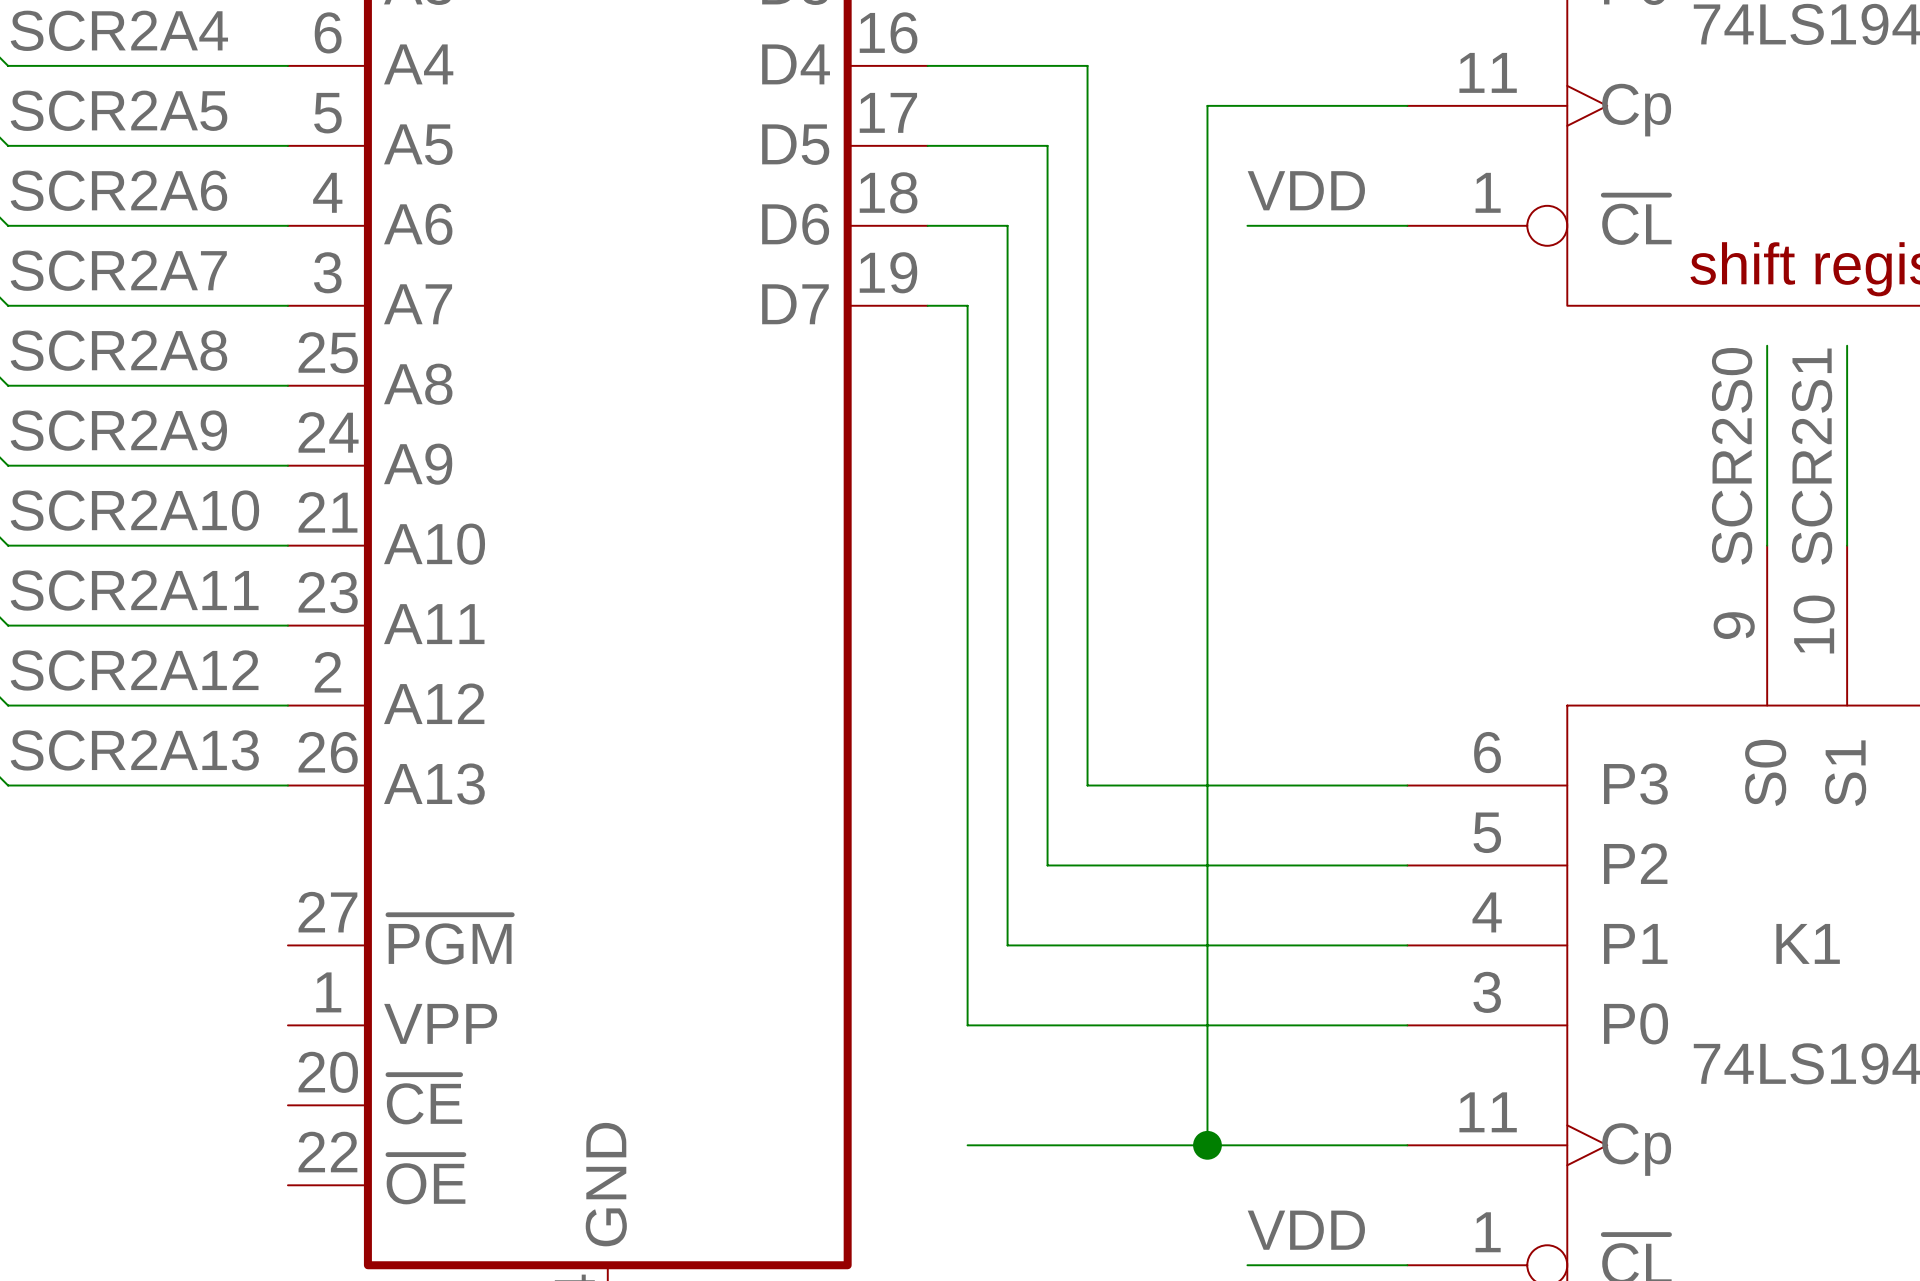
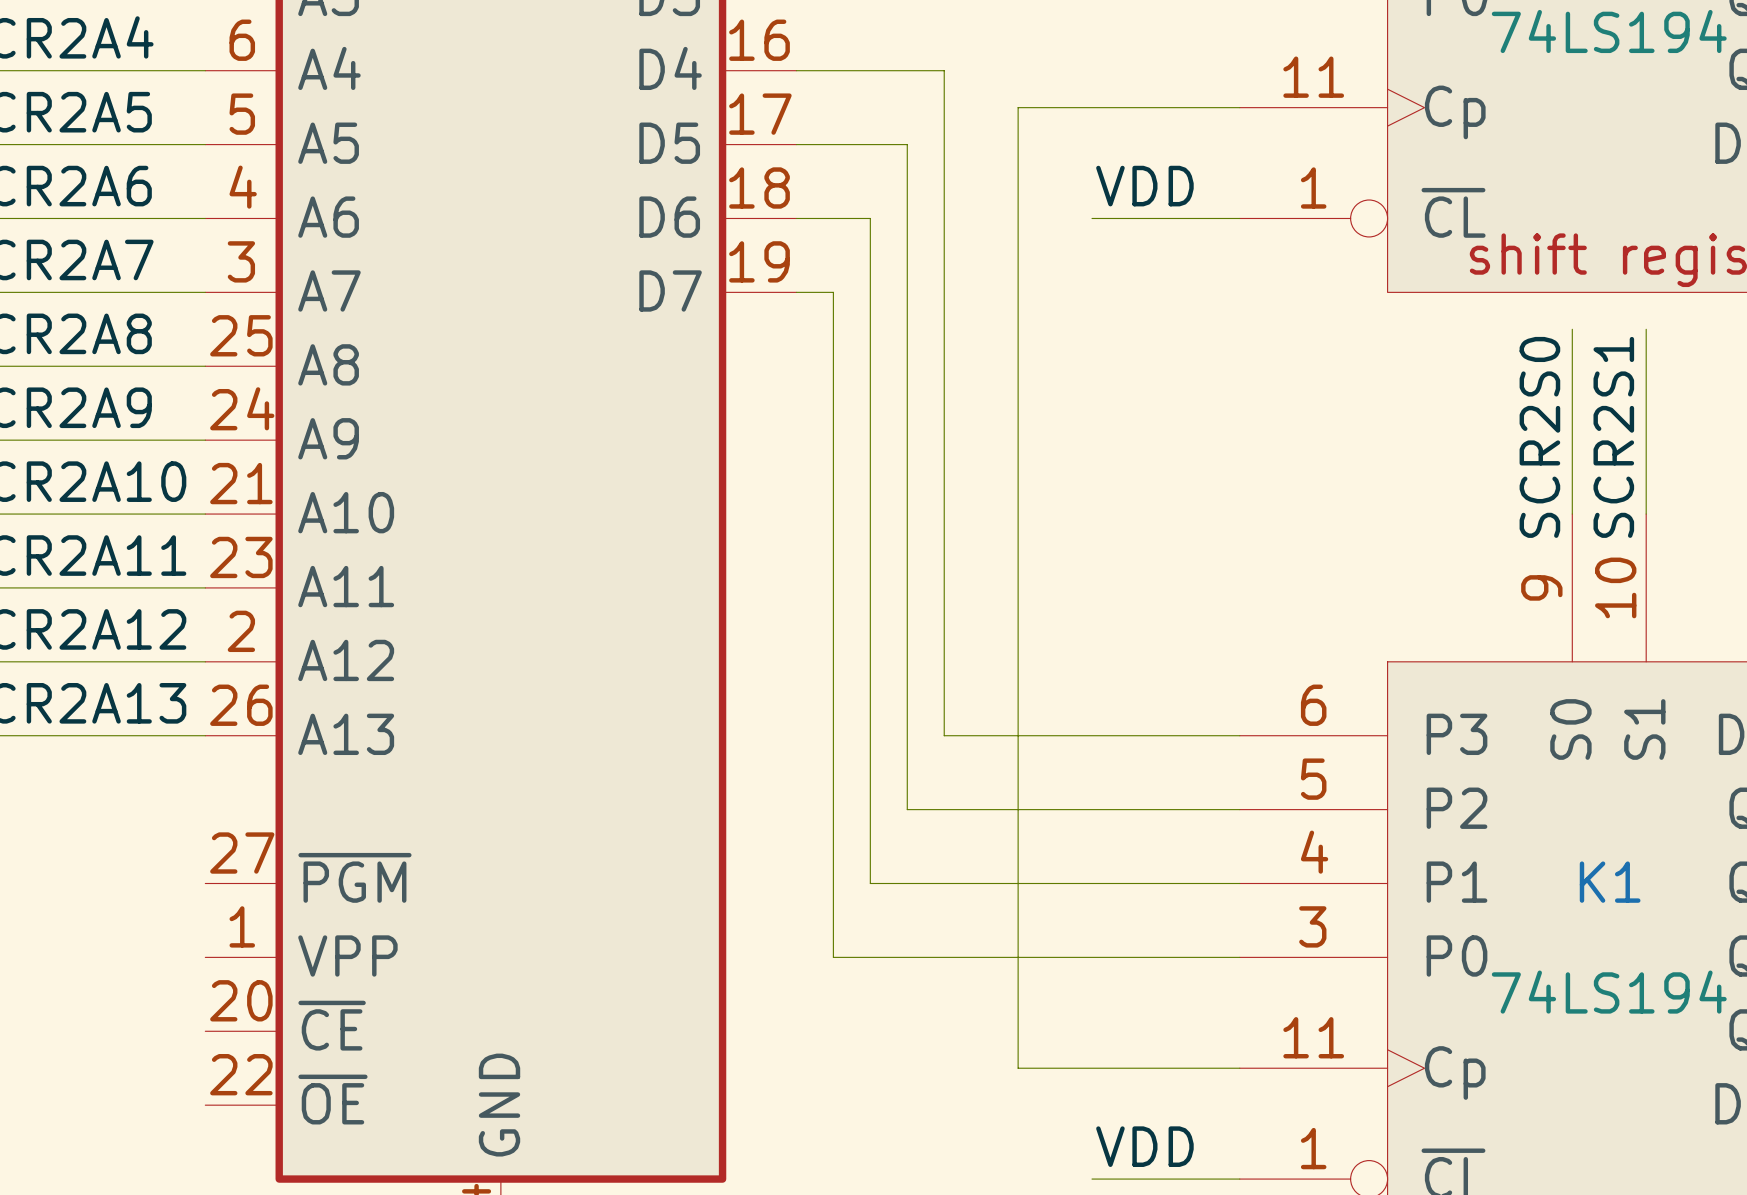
wire: (1207, 105) (1207, 1145) -> (1055, 107) (1018, 107) (1018, 1068)
wire: (967, 1145) (1167, 1145) -> none
junction: (1207, 1145) -> none

